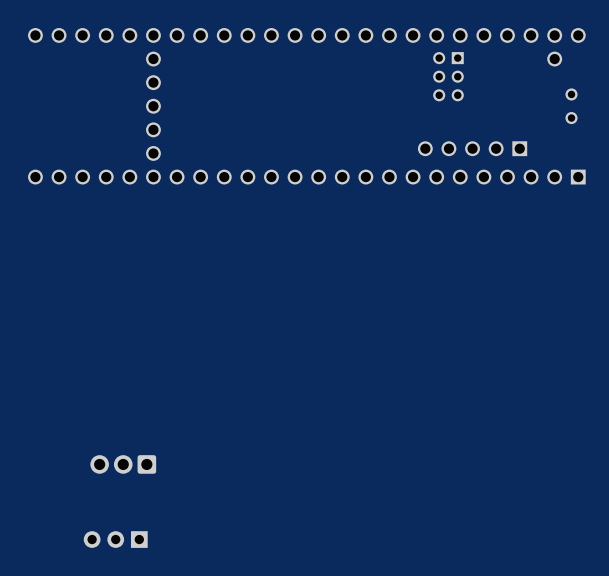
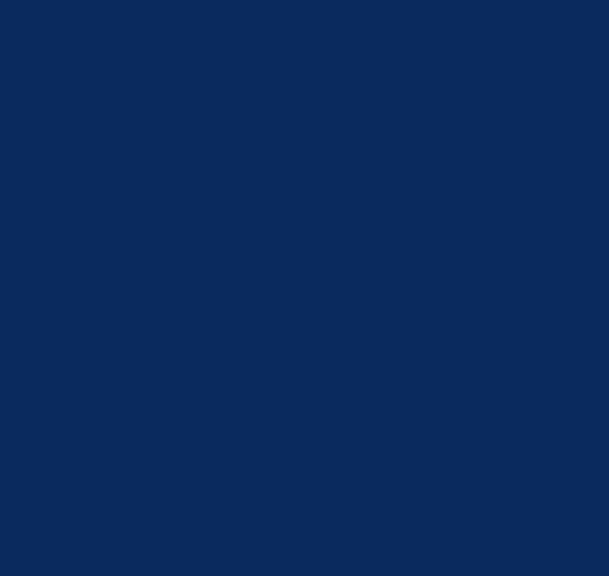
part: (306, 106) -> none
part: (123, 464) -> none
part: (115, 539) -> none

